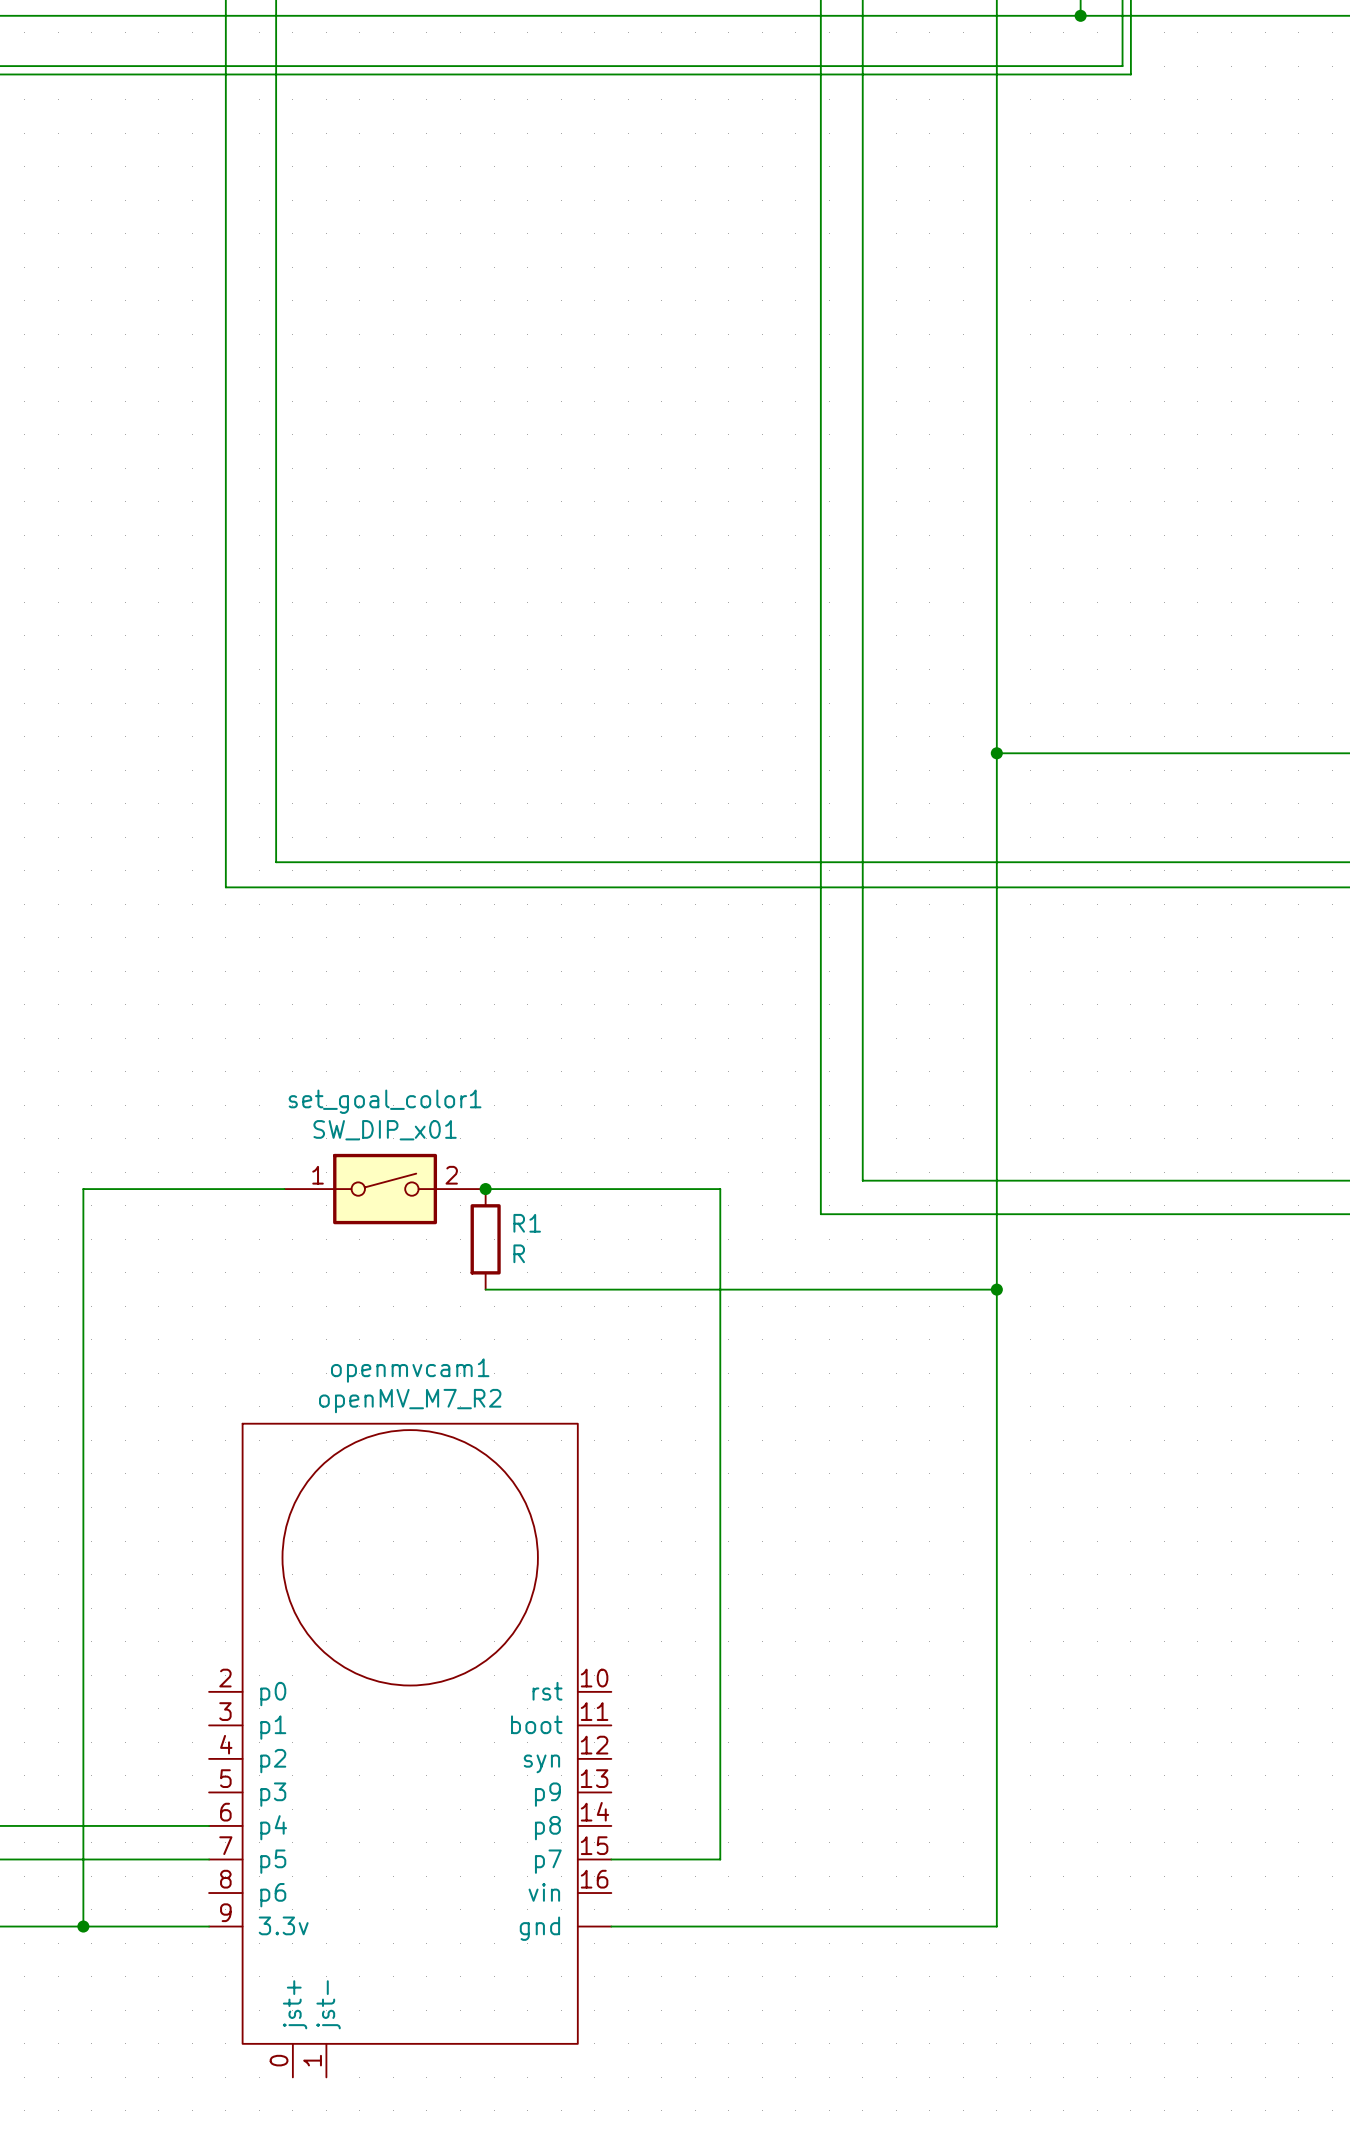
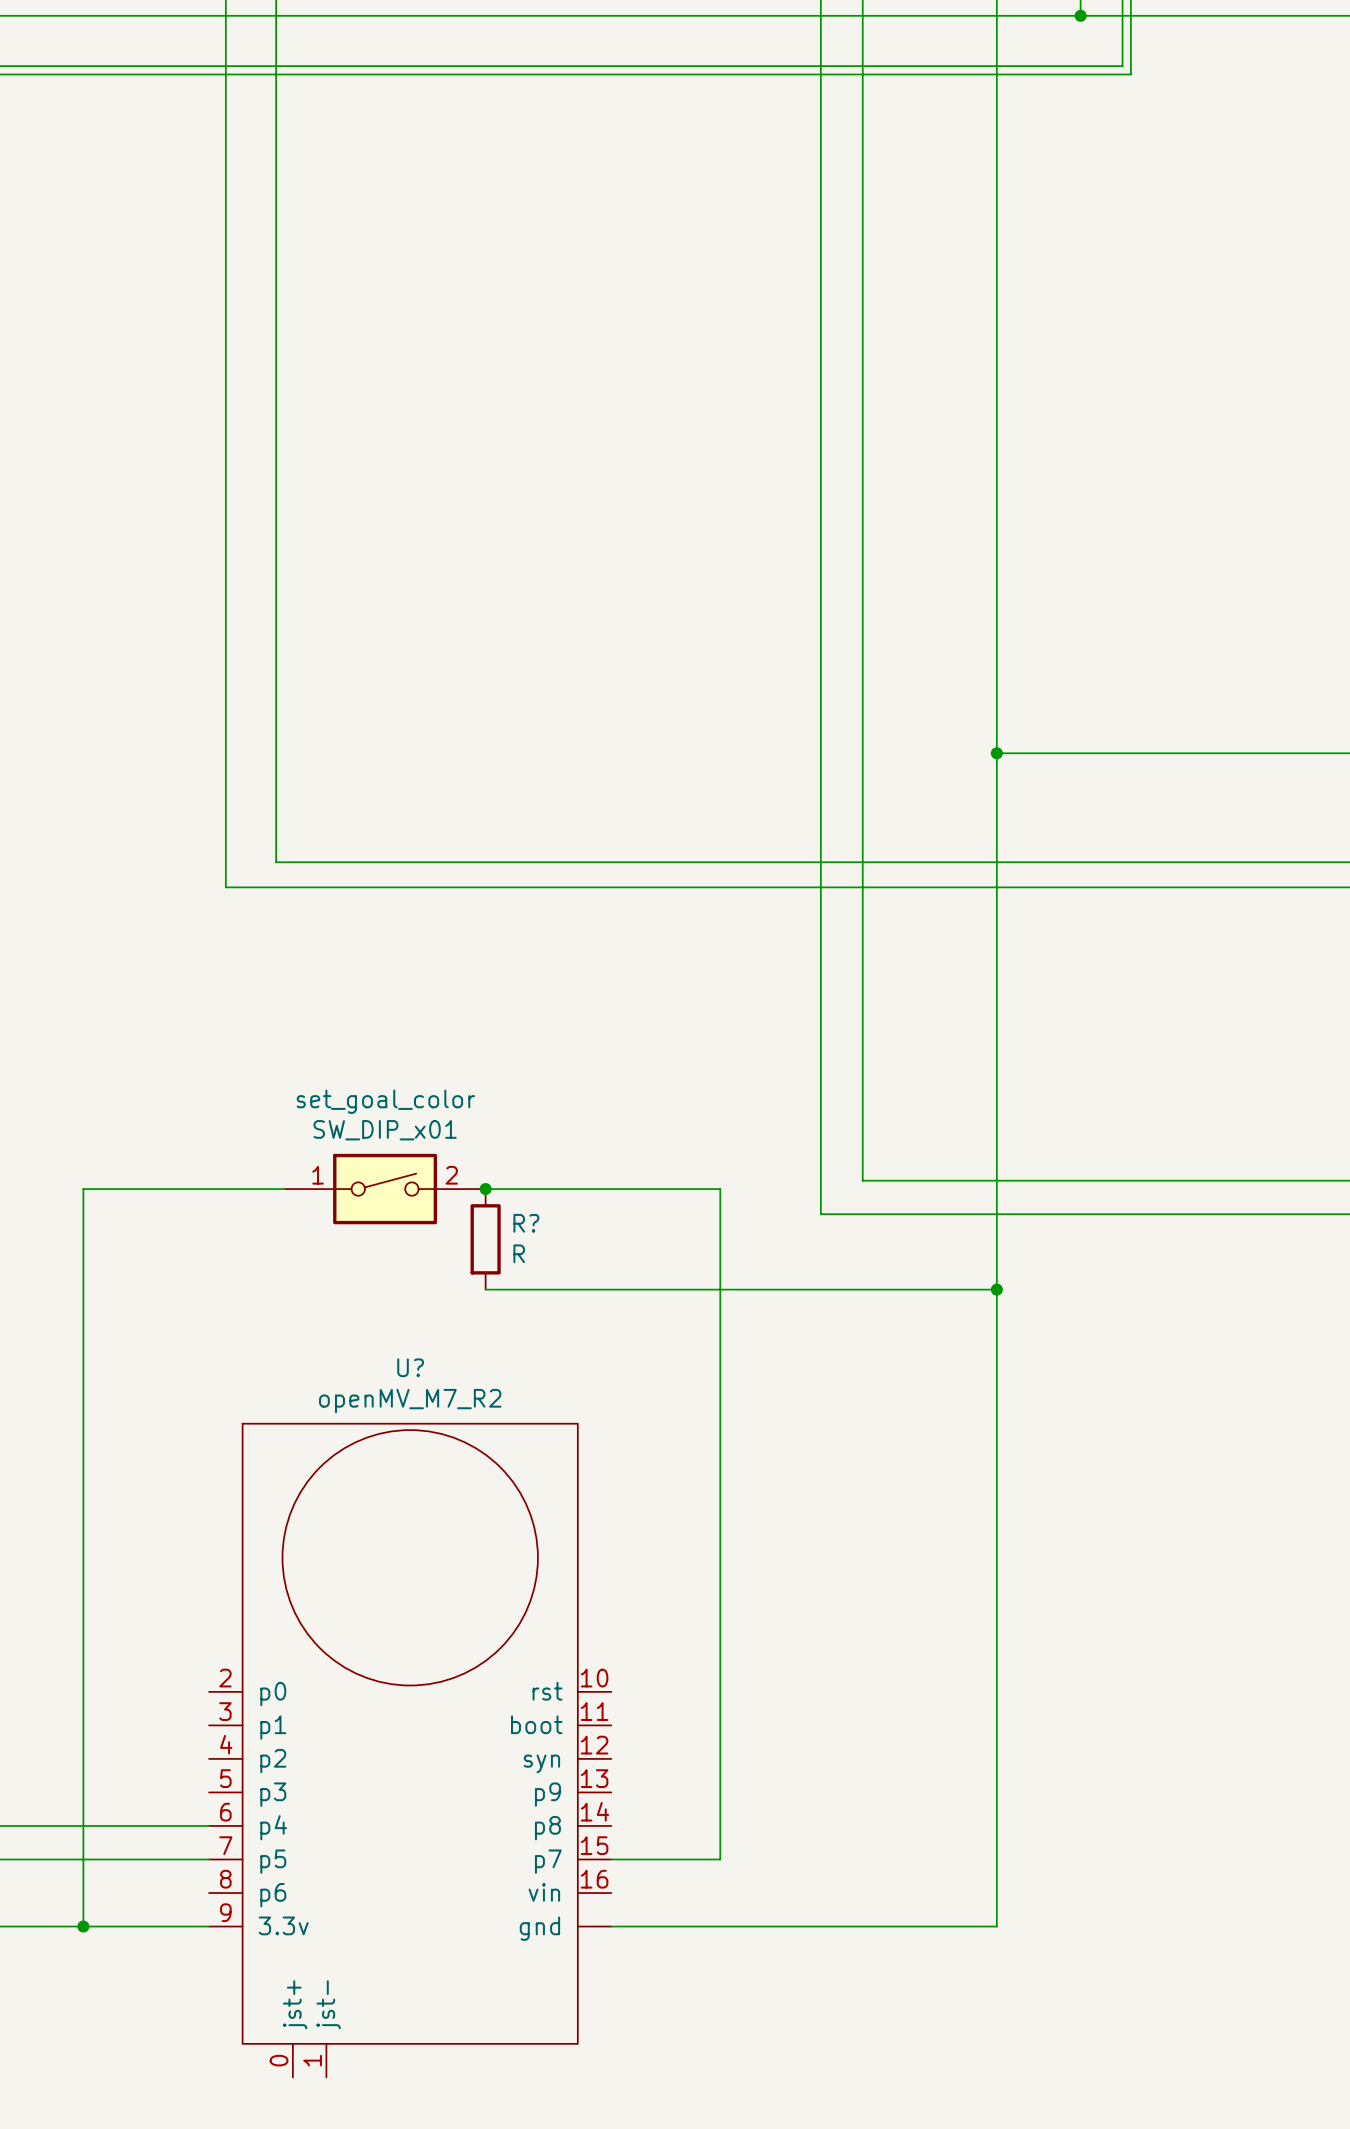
set_goal_color1 name: set_goal_color1 (385, 1101) -> set_goal_color (385, 1101)
R1 name: R1 (527, 1223) -> R? (526, 1223)
openmvcam1 name: openmvcam1 (410, 1370) -> U? (410, 1367)

